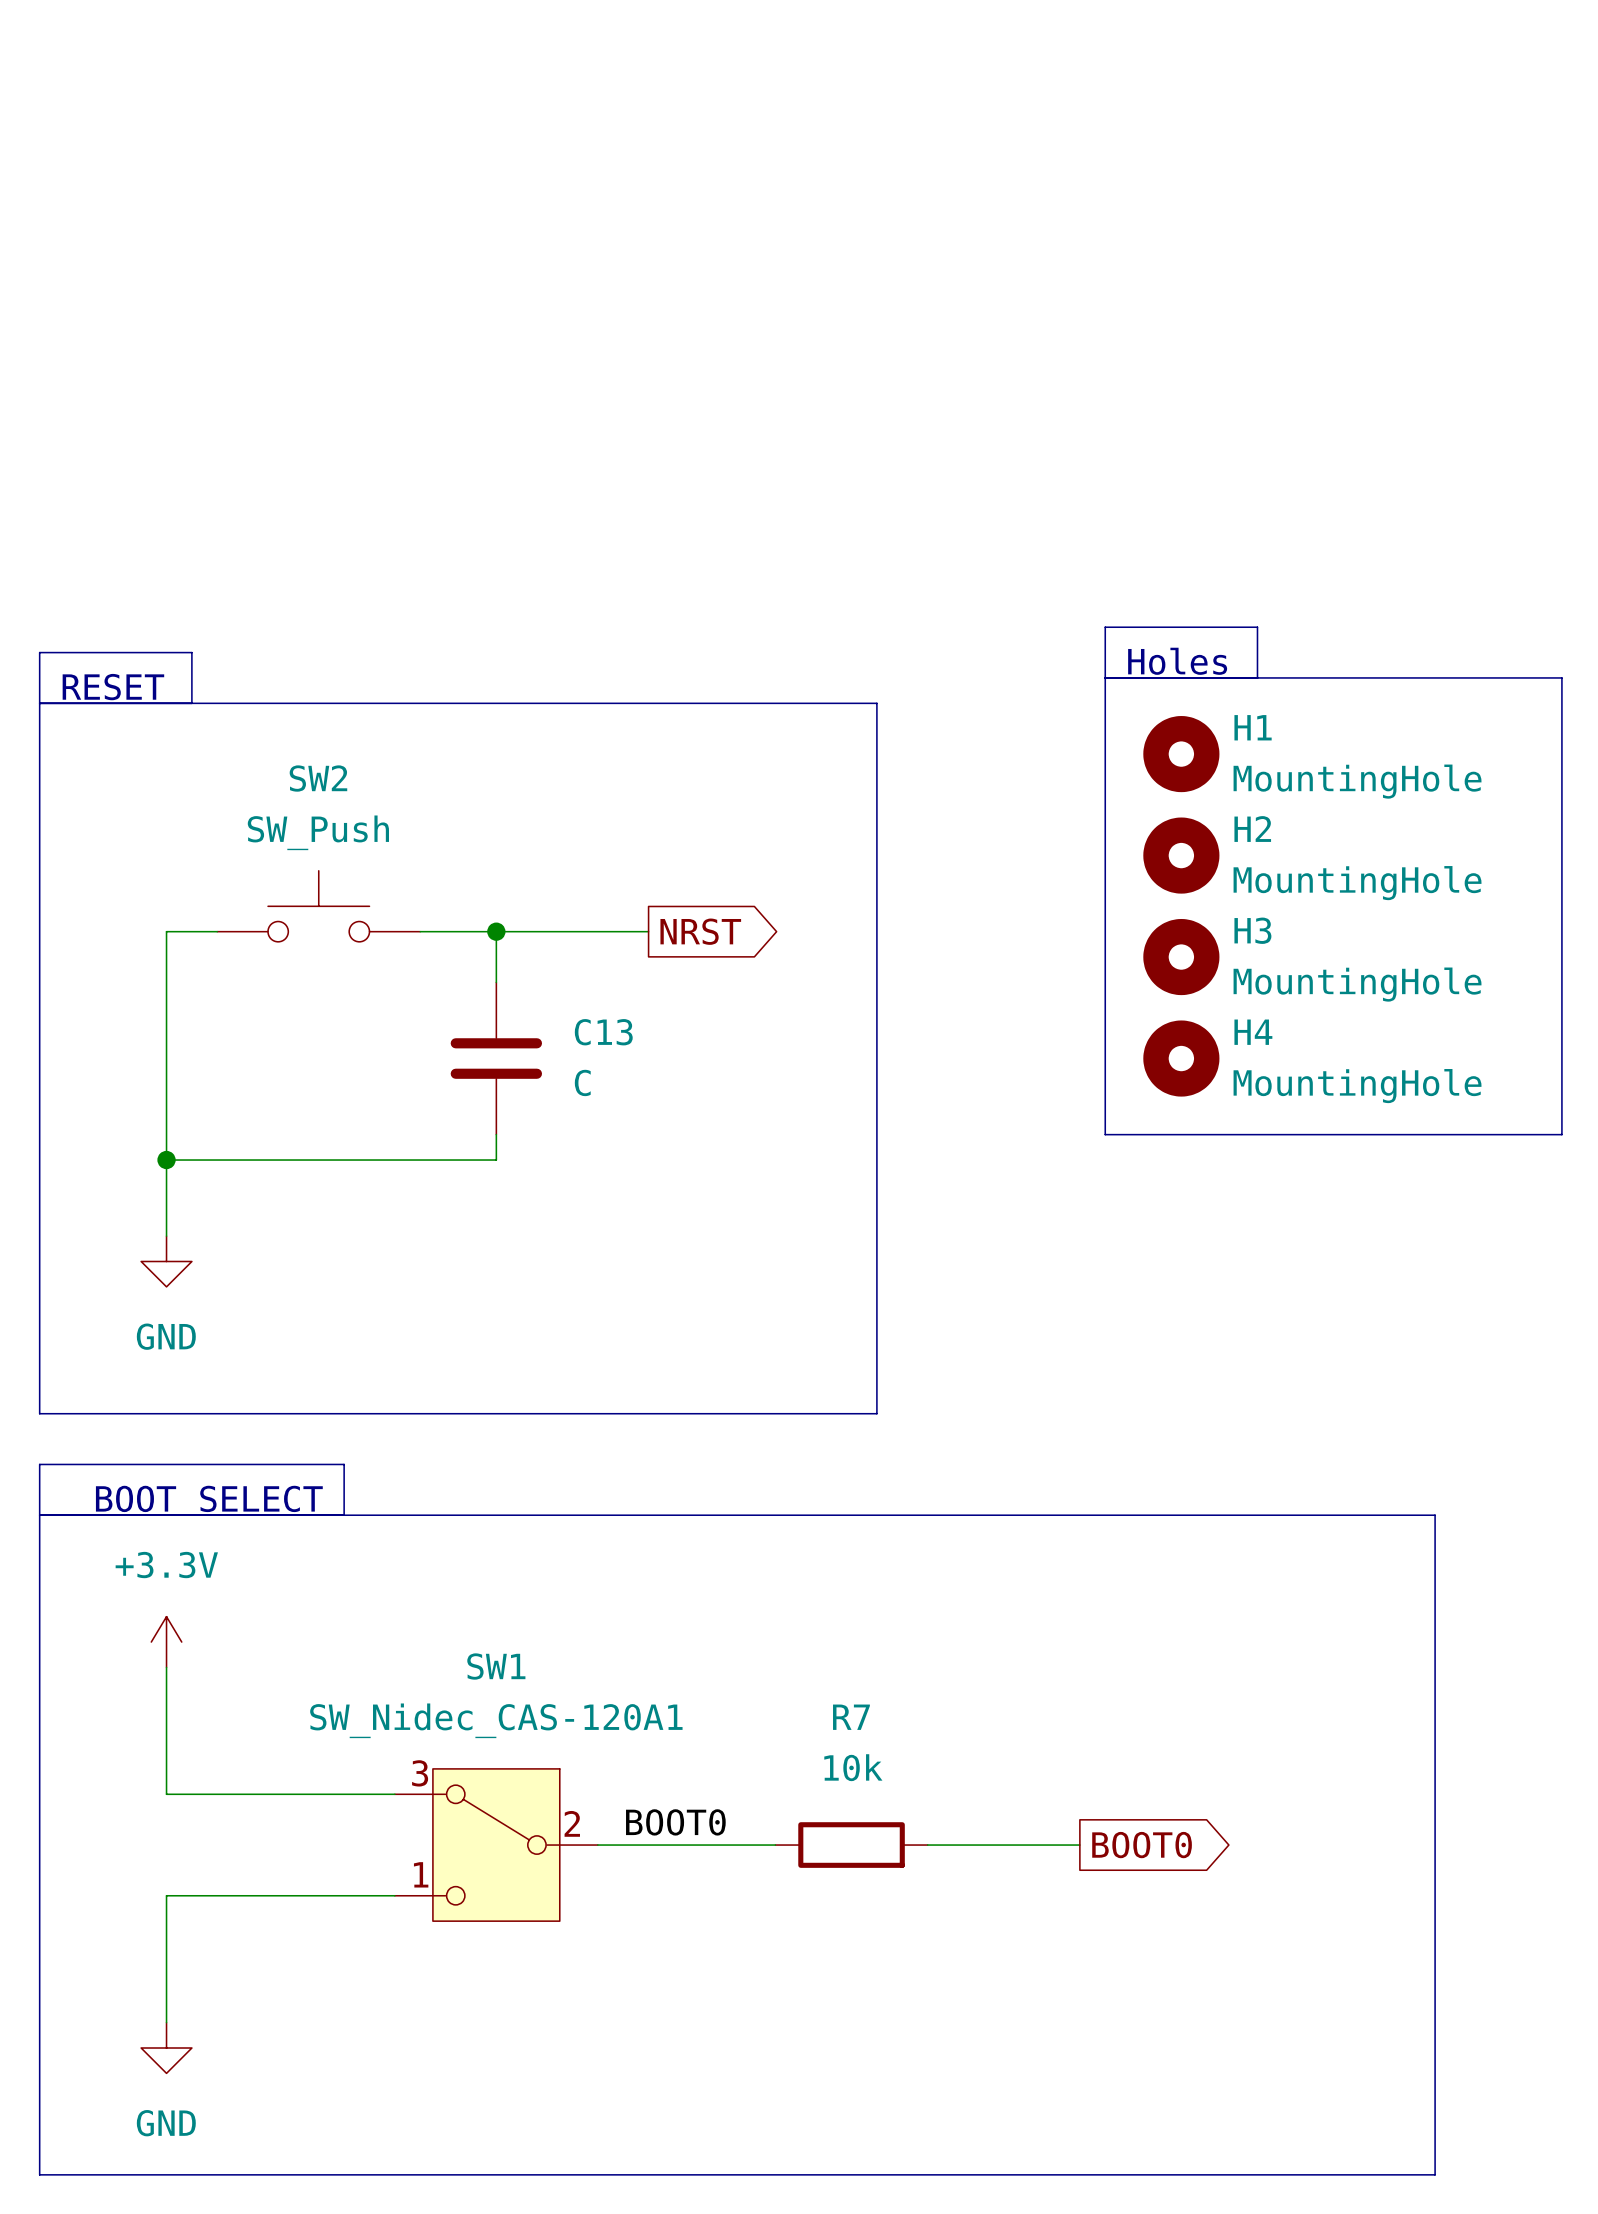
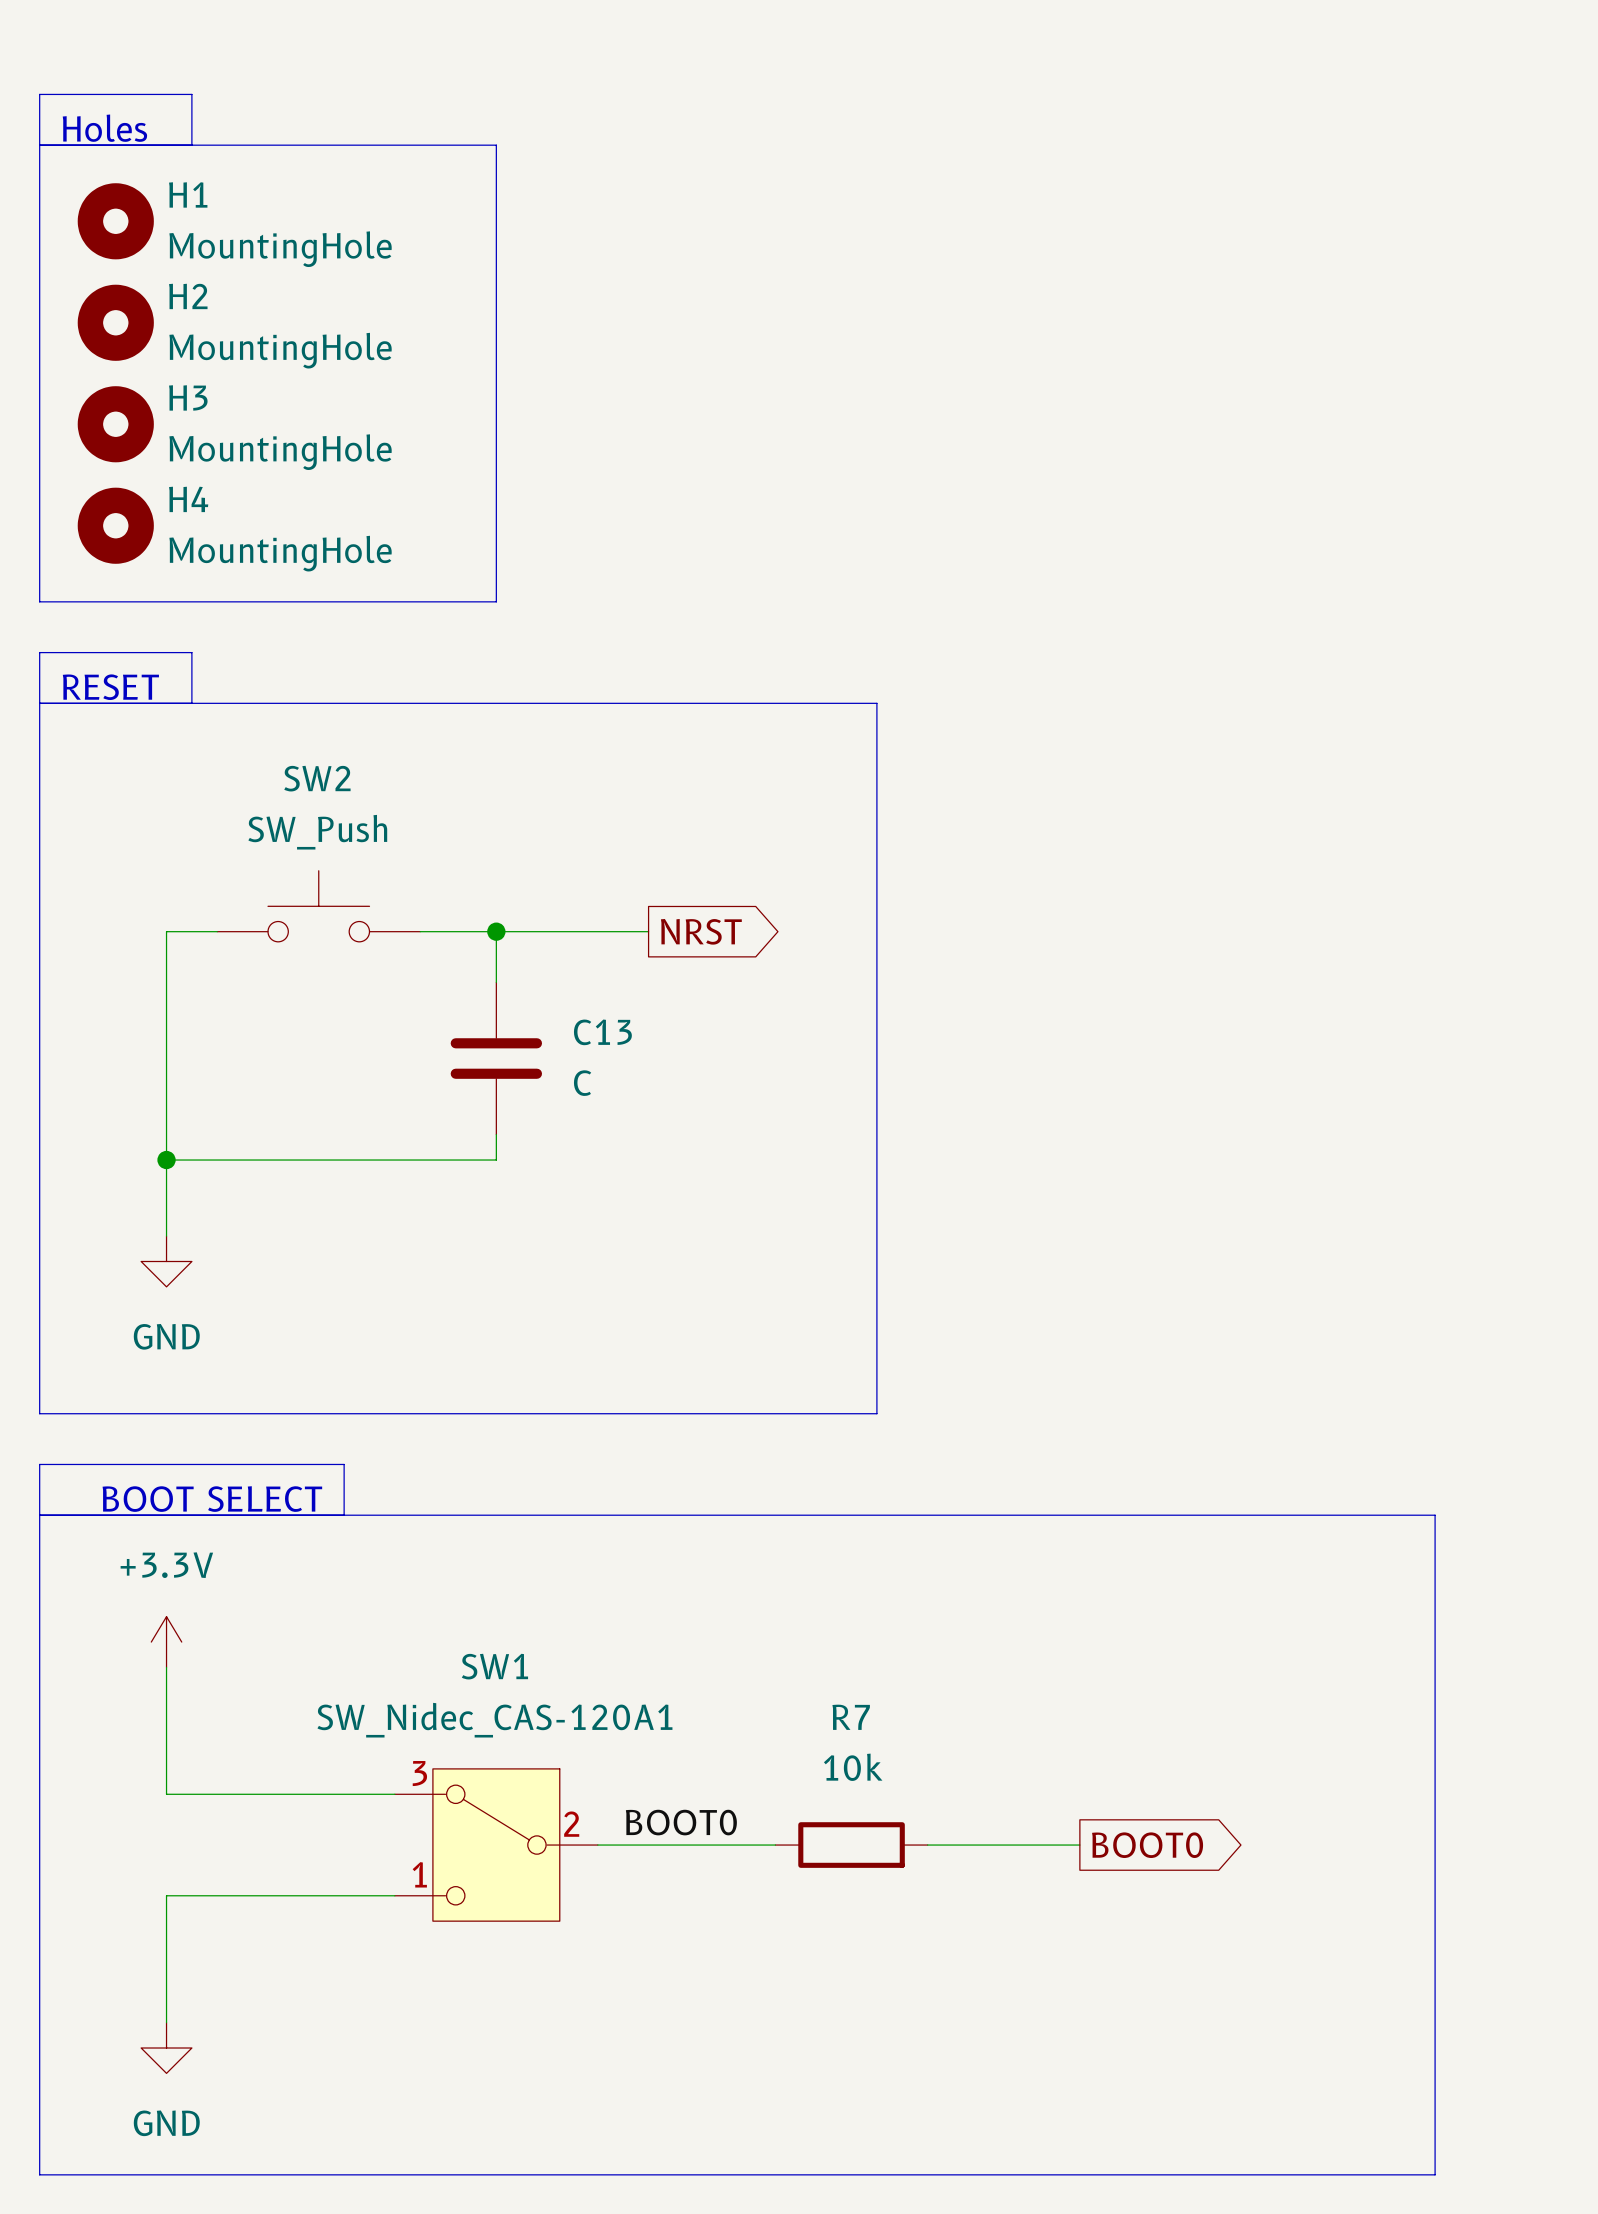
text: none -> Holes (104, 128)
line: none -> (39, 145) (496, 145) (496, 601) (39, 601) (39, 94) (191, 94) (191, 145)
text: Holes (1177, 661) -> none
line: (1105, 677) (1561, 677) (1561, 1134) (1105, 1134) (1105, 627) (1257, 627) (1257, 677) -> none
H1 position: (1181, 754) -> (115, 221)
H2 position: (1181, 855) -> (115, 322)
H3 position: (1181, 957) -> (115, 424)
H4 position: (1181, 1058) -> (115, 525)

